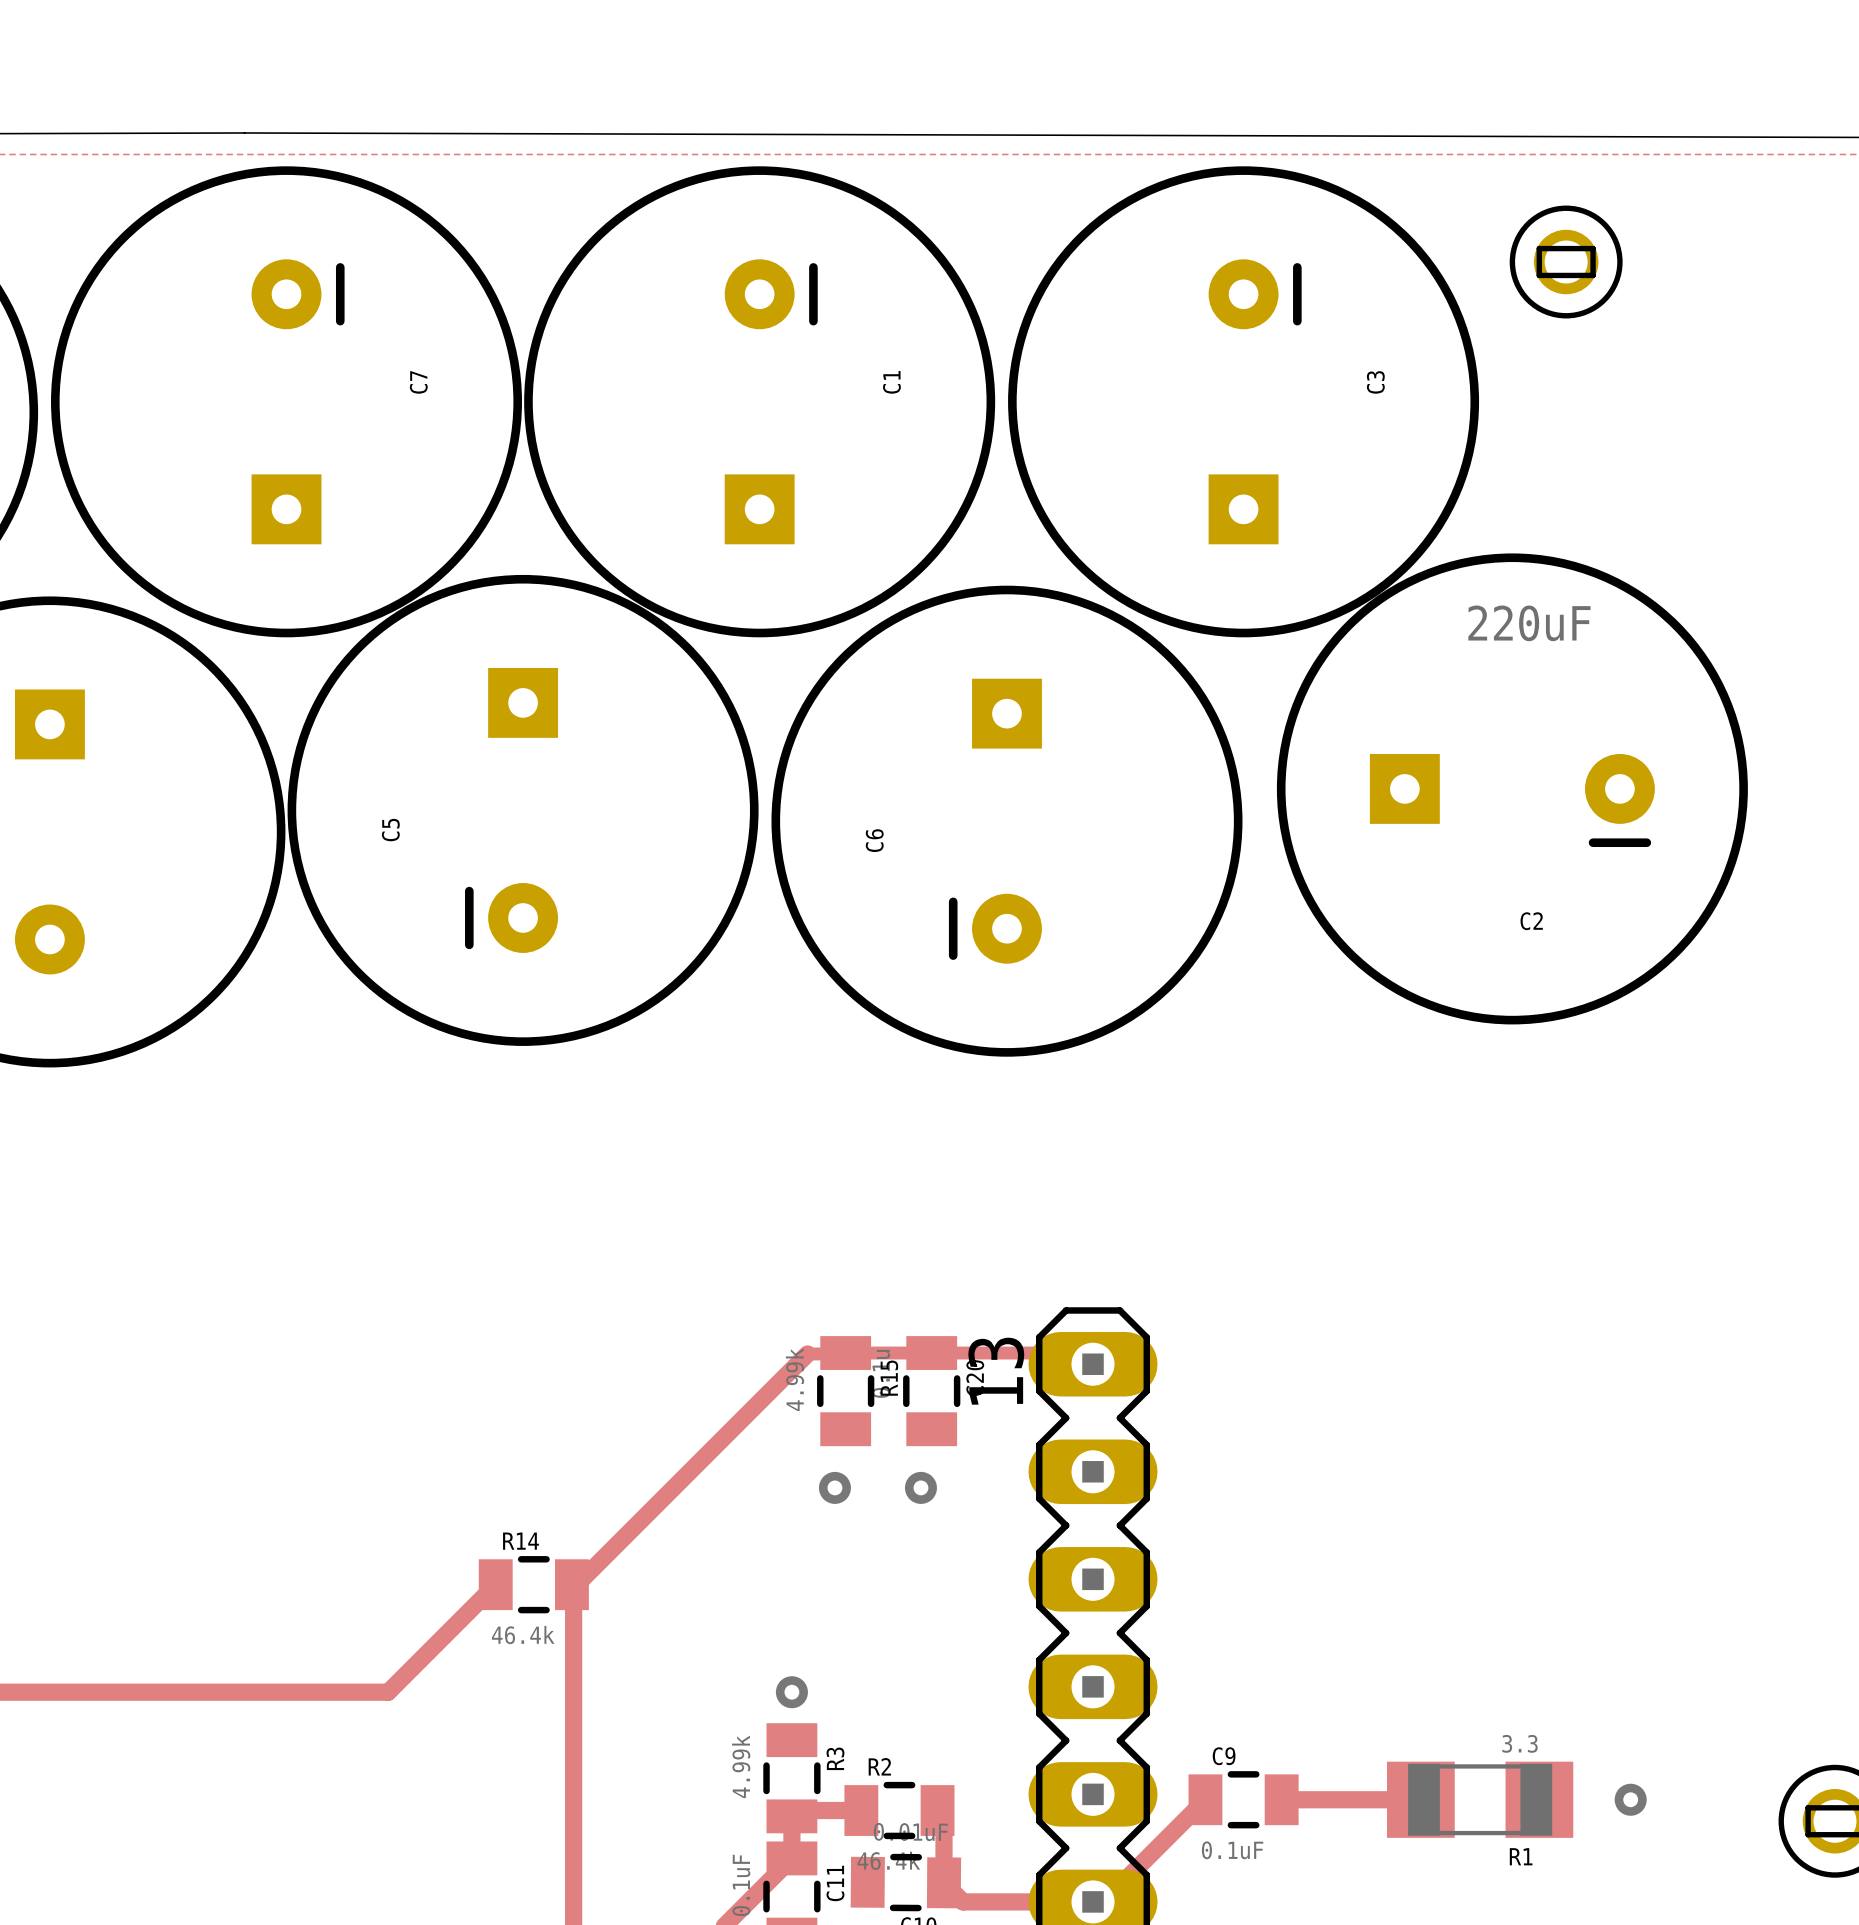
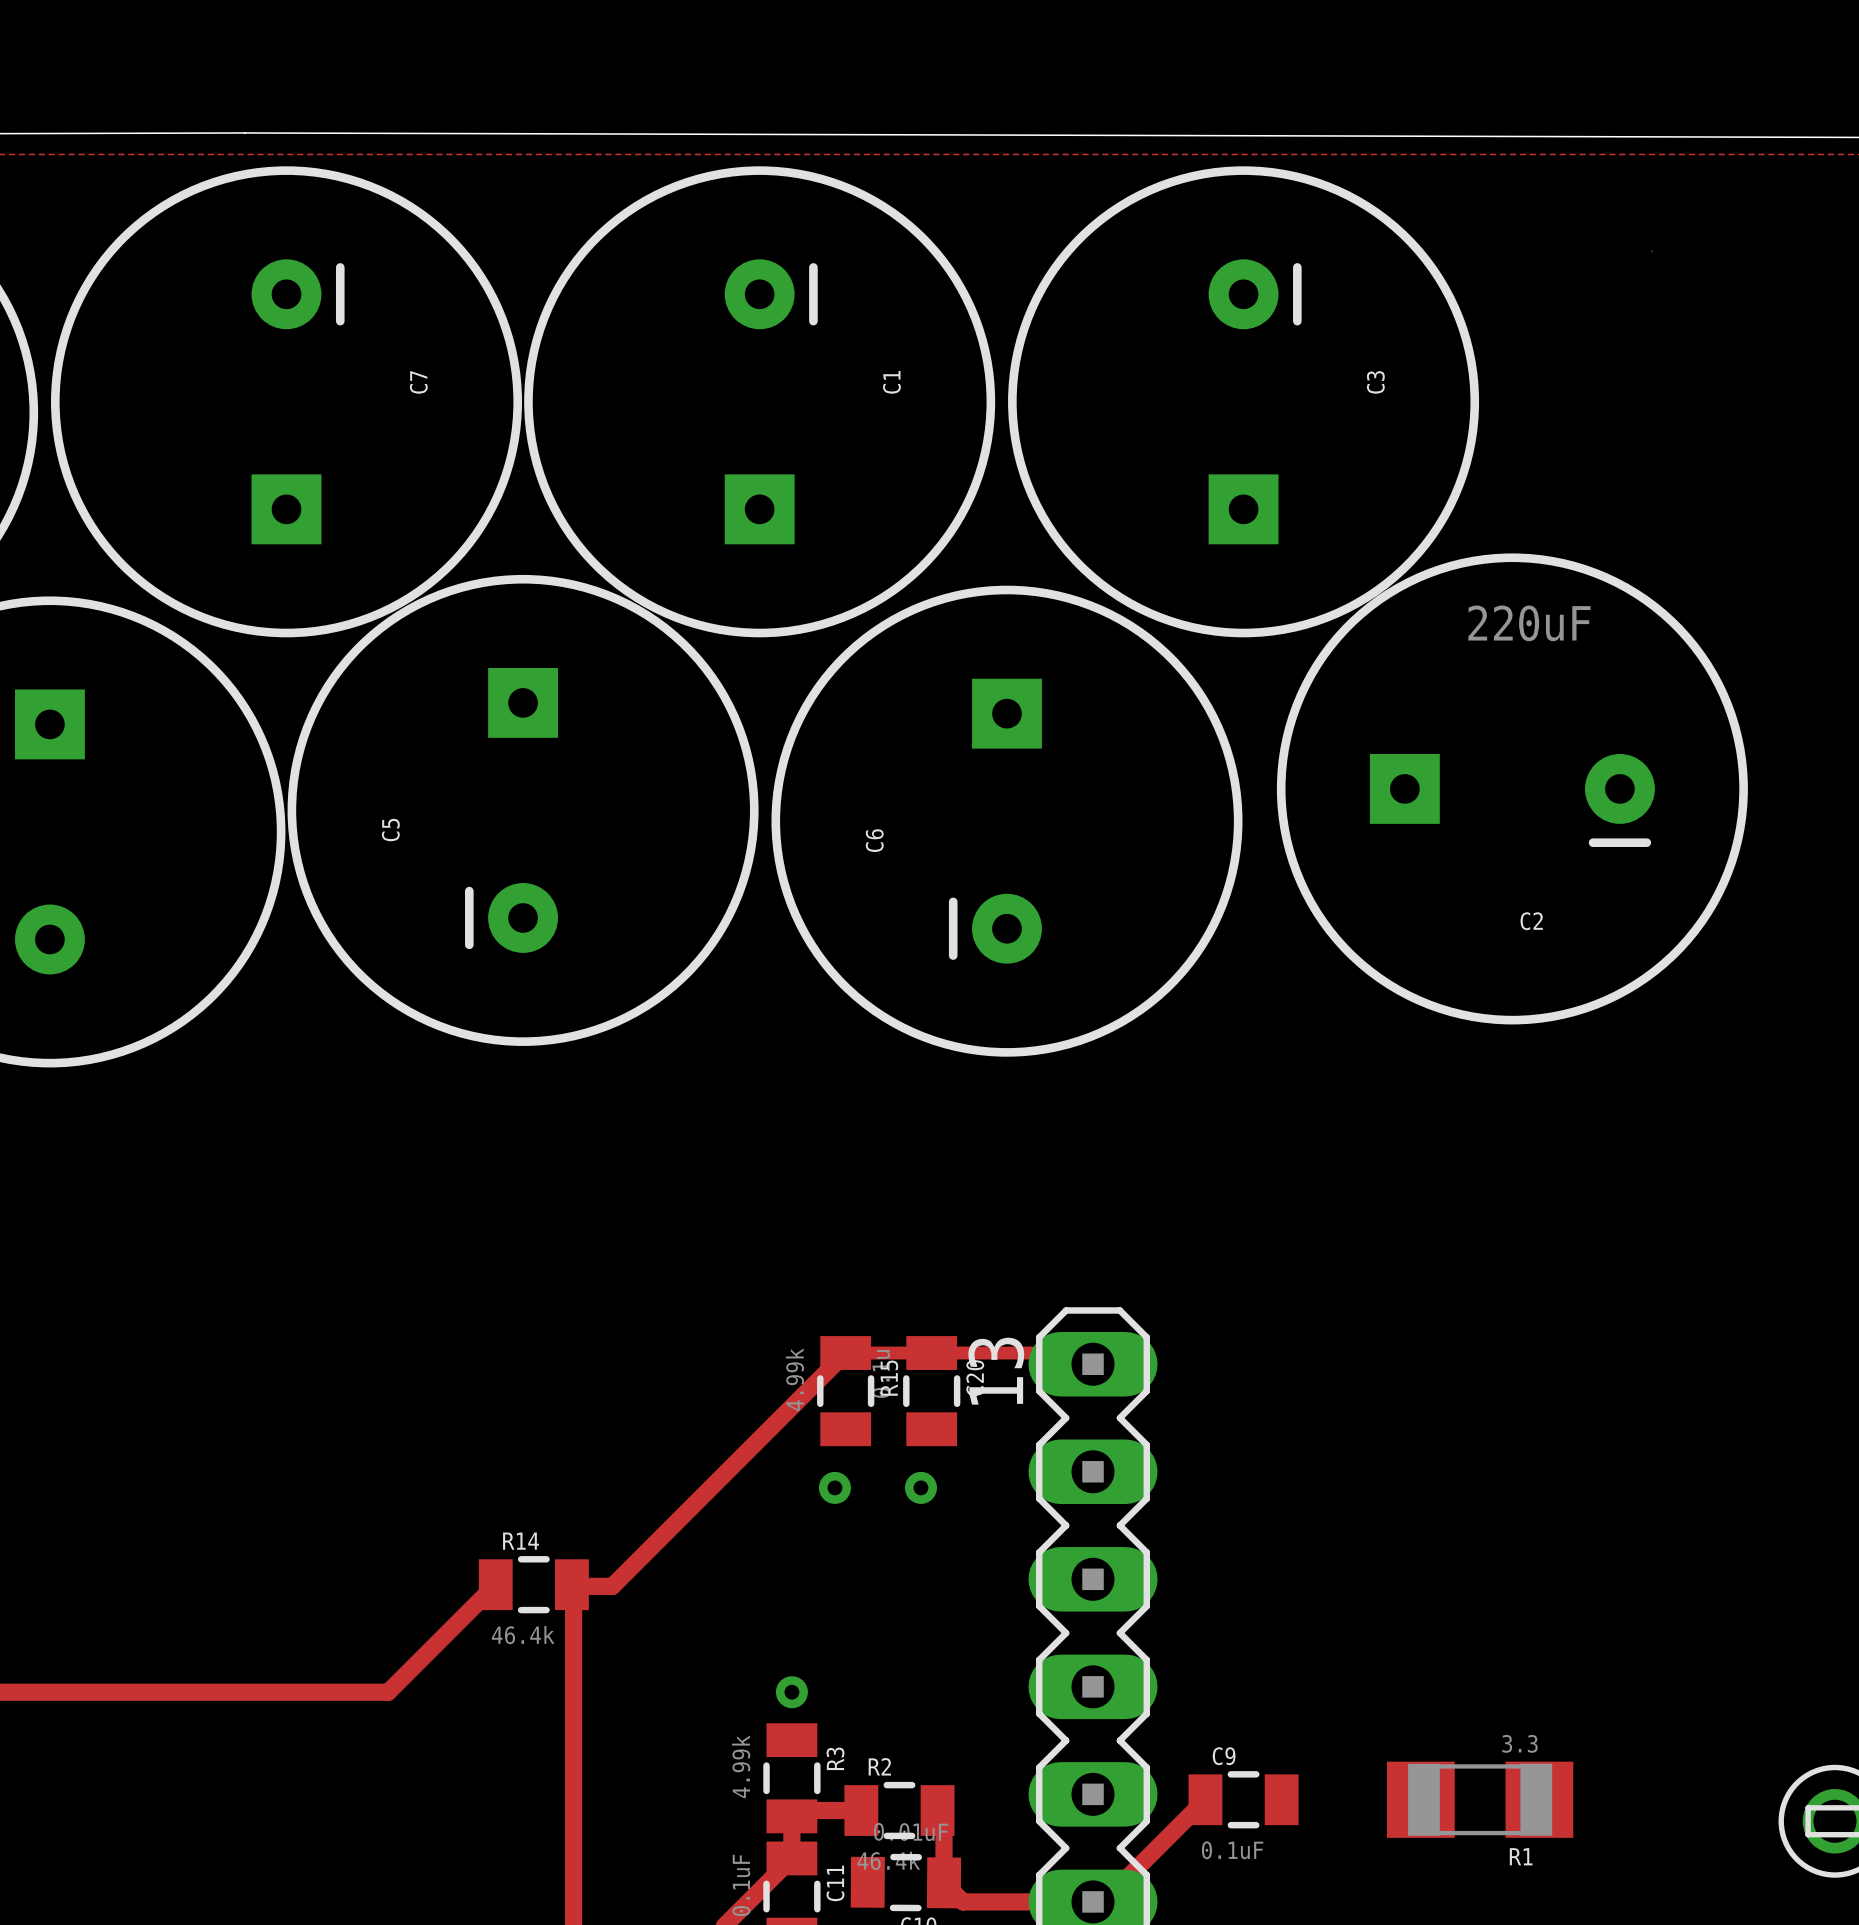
part: (1566, 262) -> none
track: (844, 1353) (807, 1353) (574, 1587) -> (845, 1353) (612, 1586) (573, 1586) (571, 1584)
track: (1281, 1799) (1420, 1799) -> none
via: (1630, 1799) -> none

